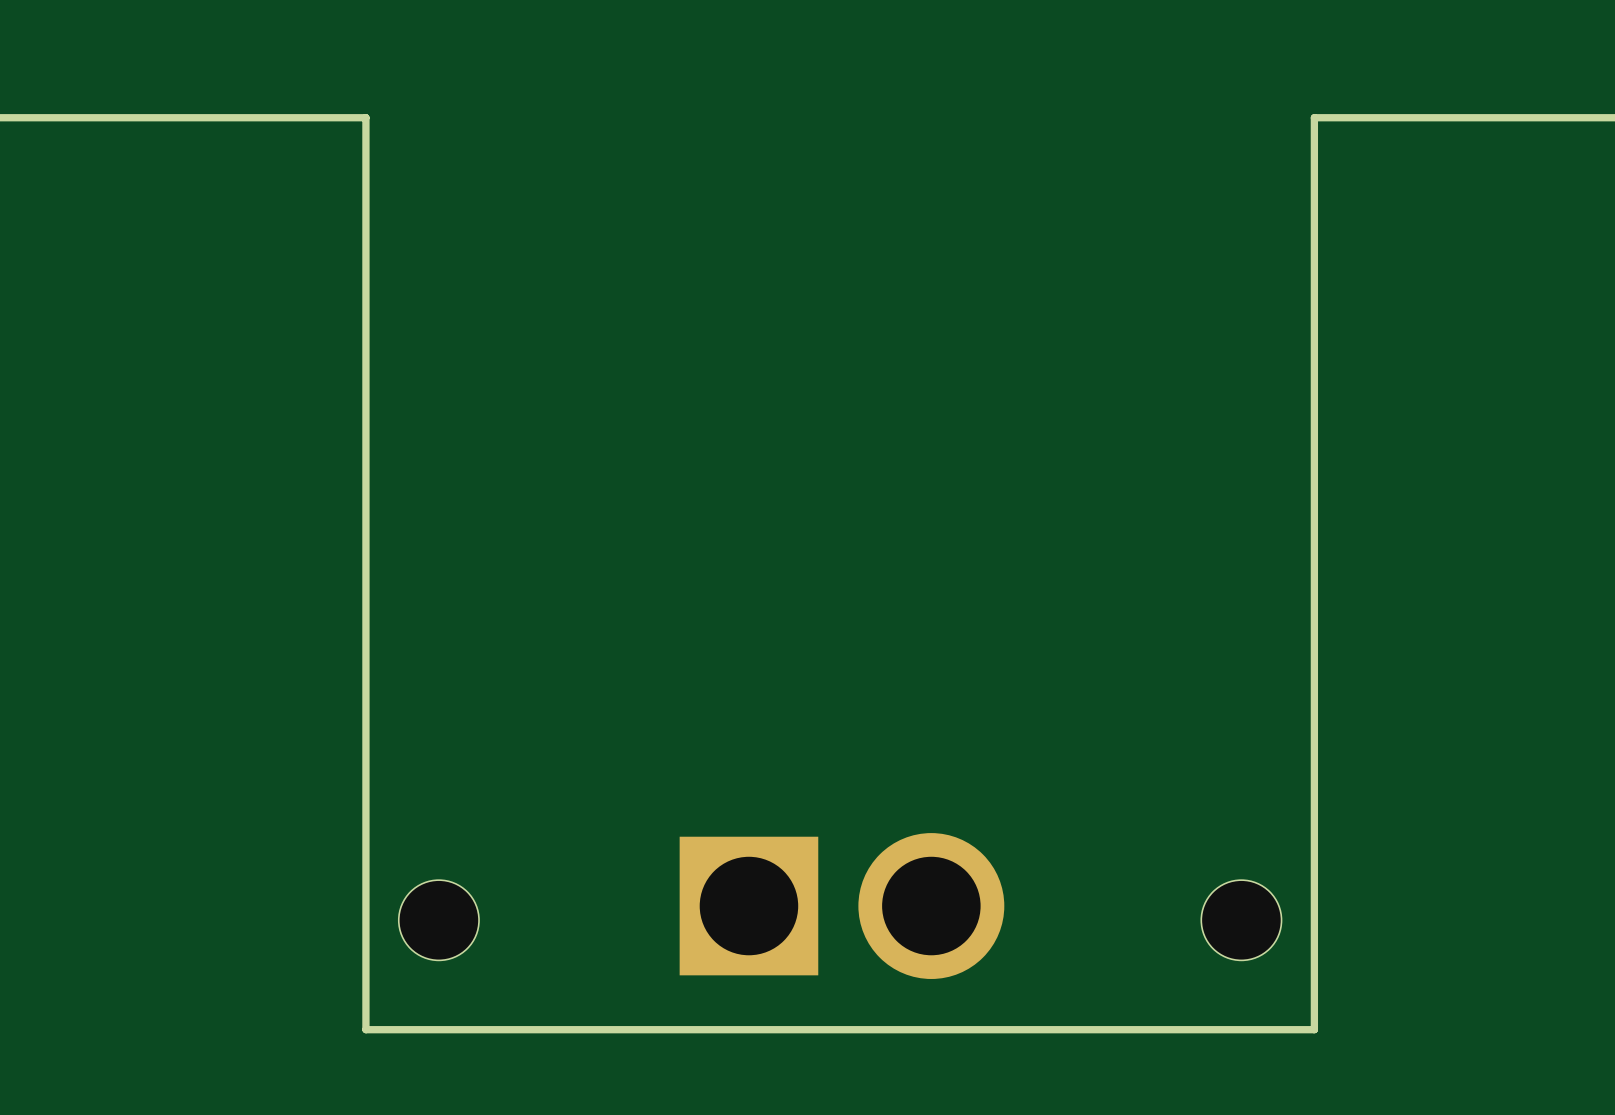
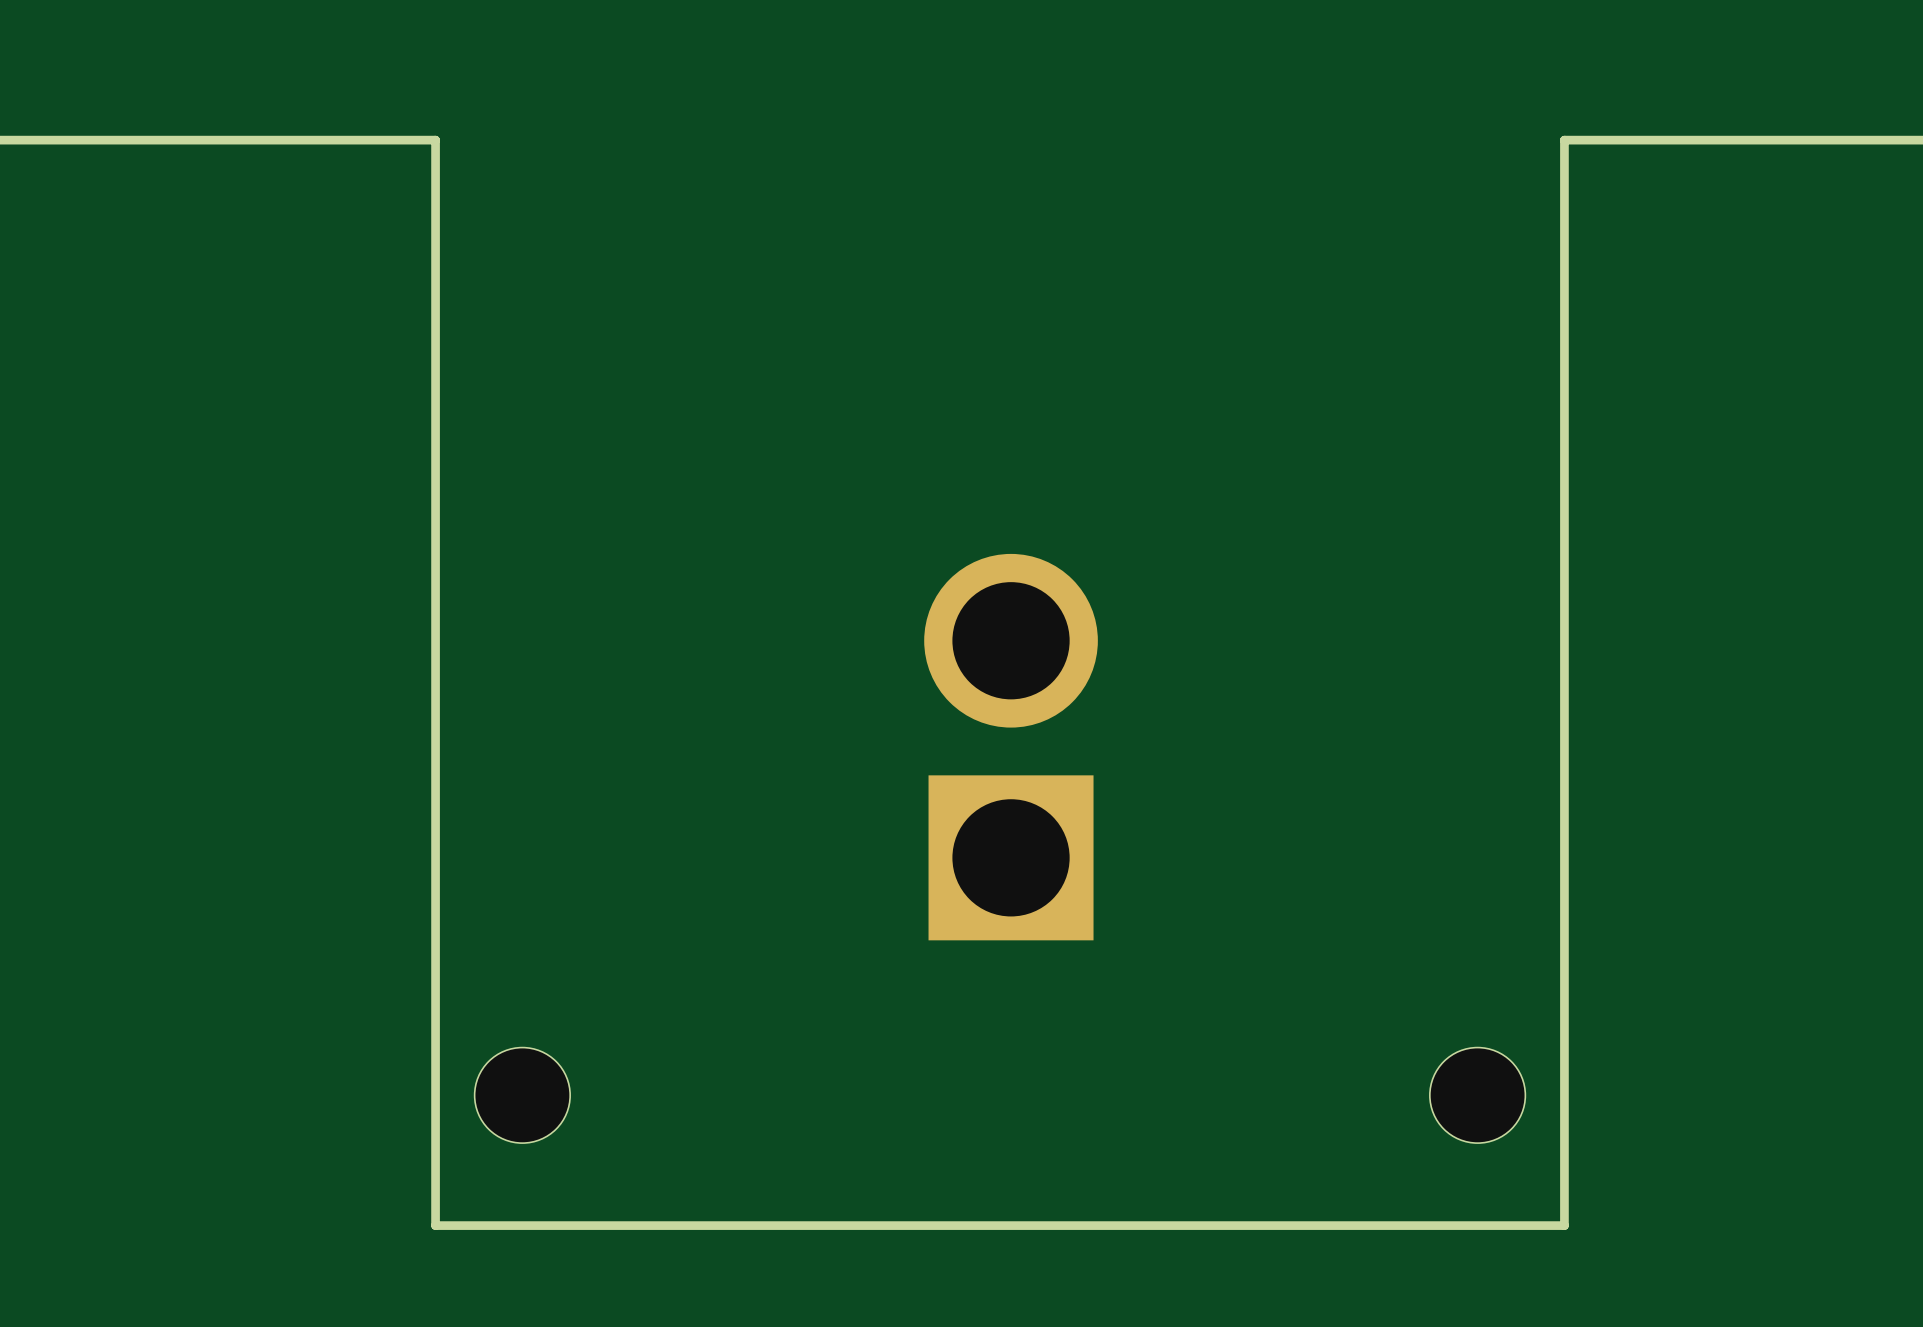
part rotation: 0° (841, 906) -> 90° counterclockwise (1011, 747)
part position: (841, 906) -> (1011, 747)

